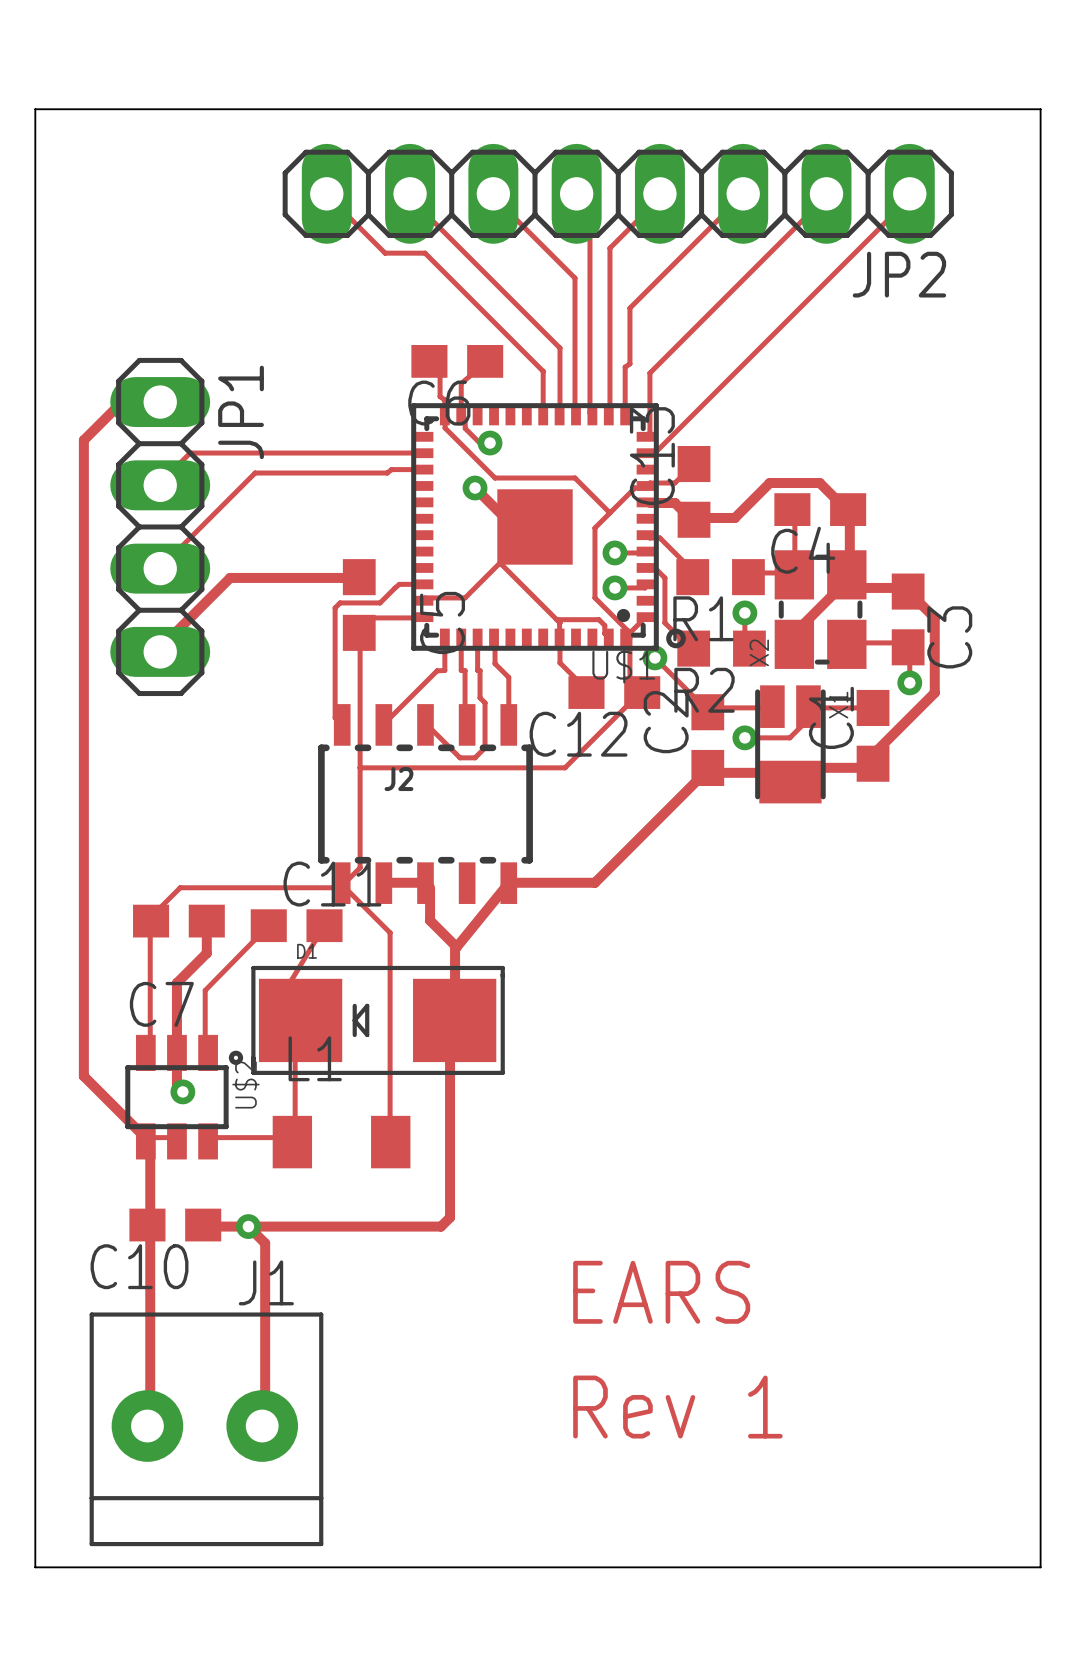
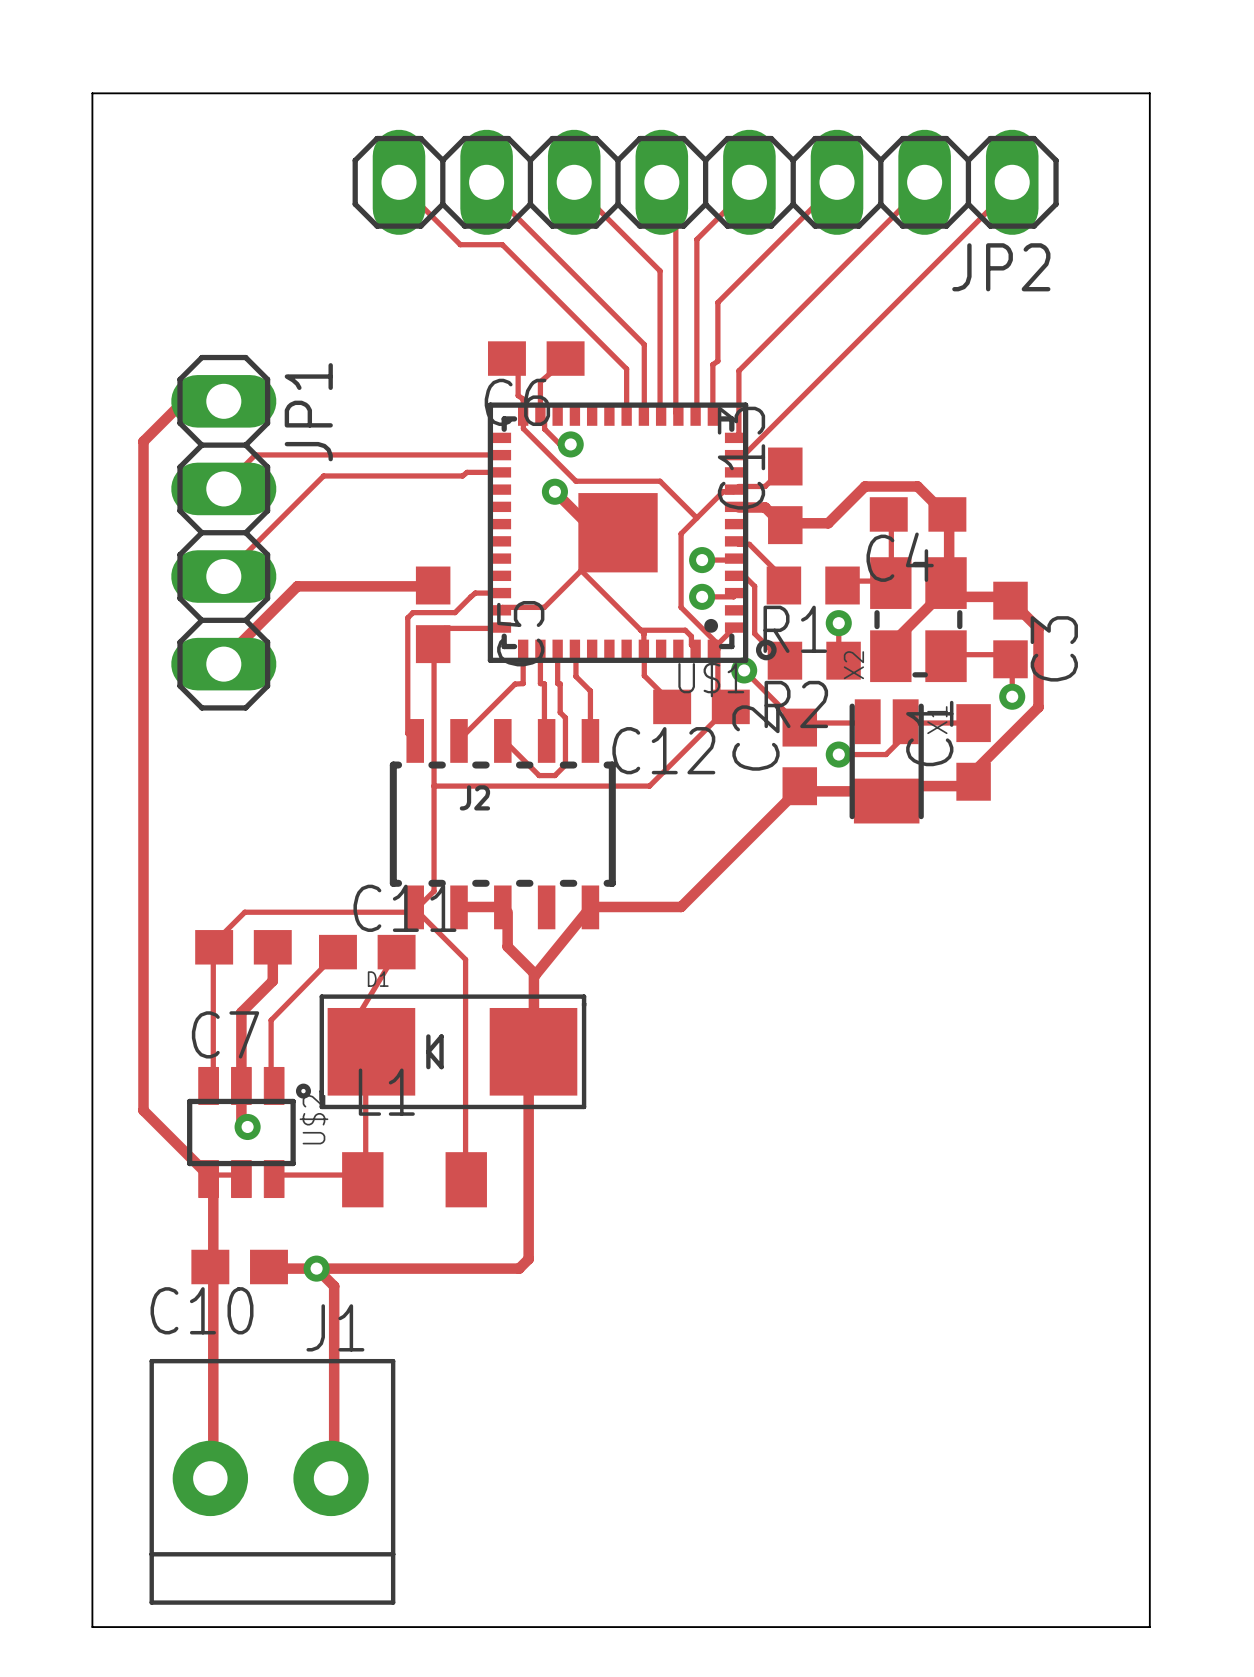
text: EARS (661, 1292) -> none
text: Rev 1 (677, 1407) -> none

